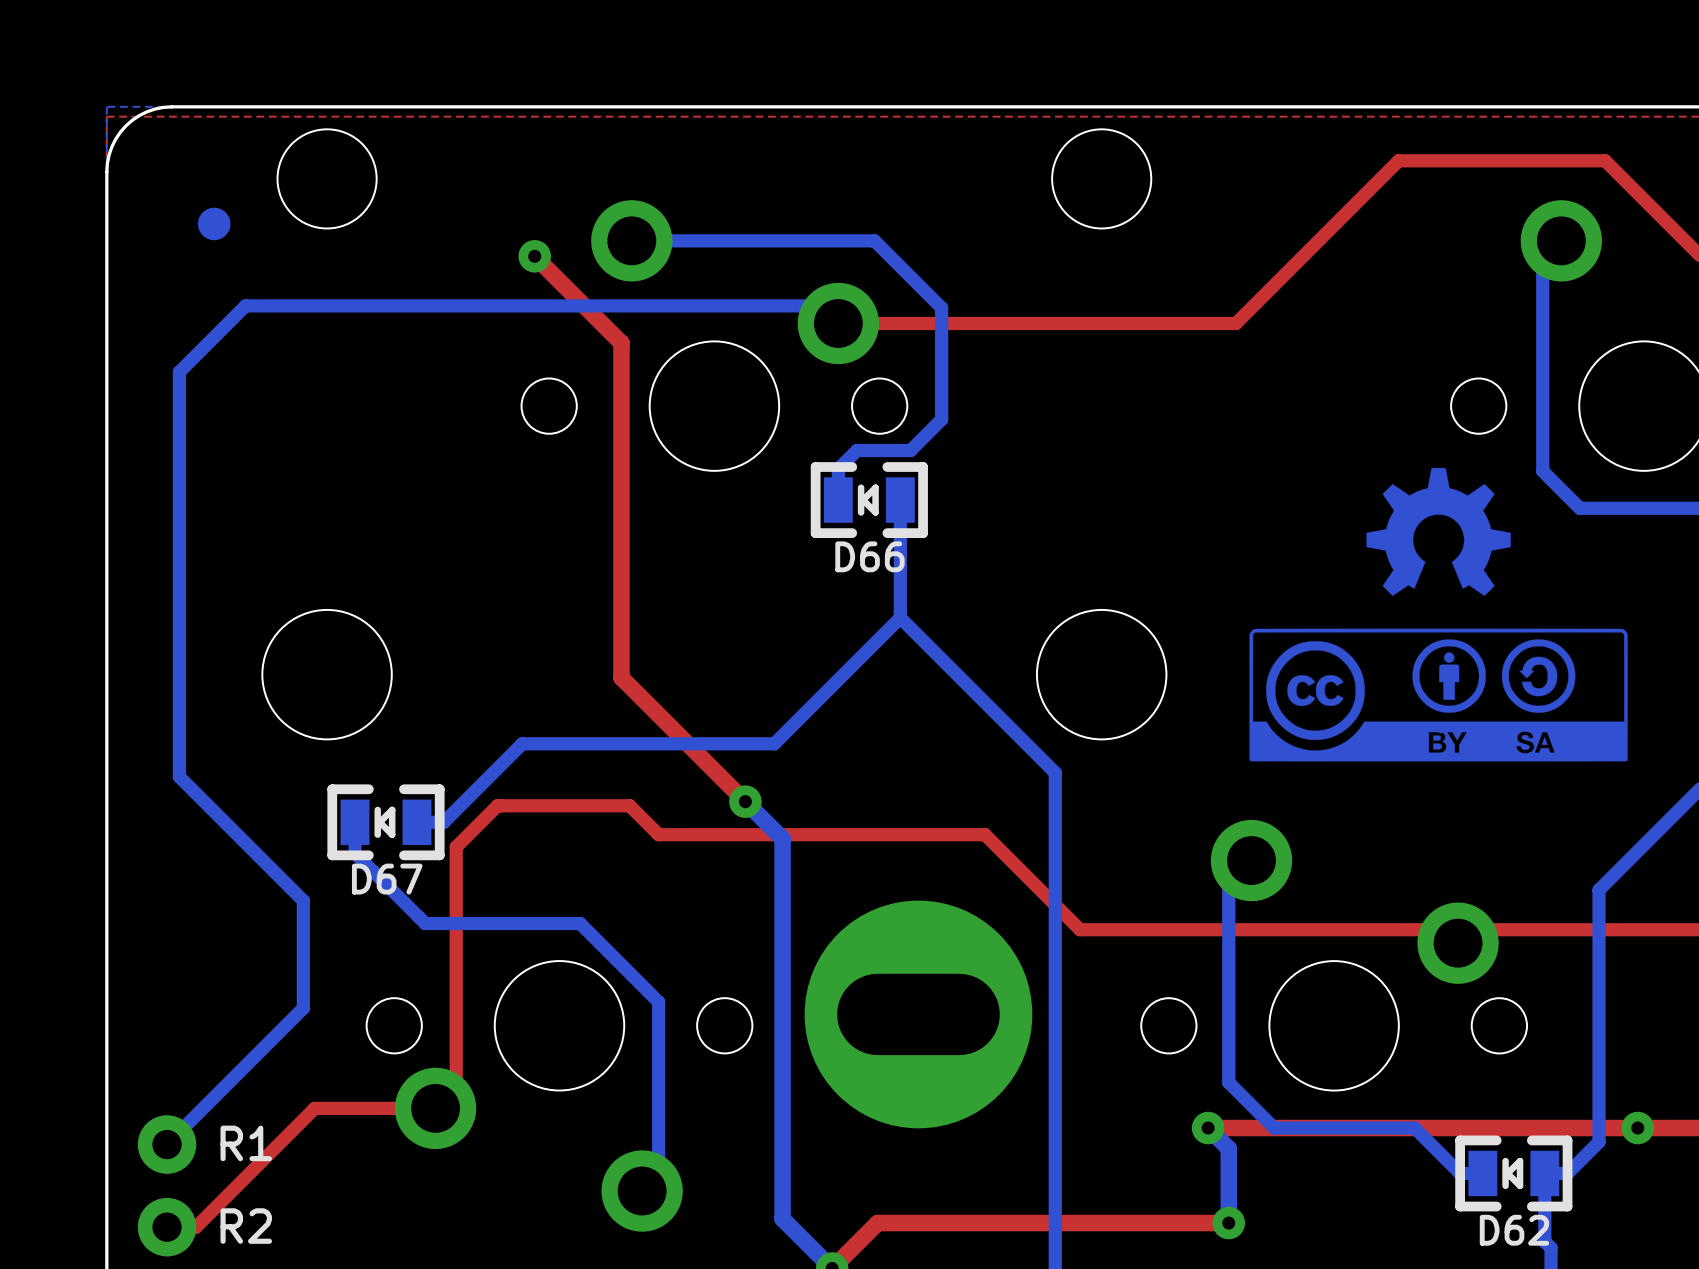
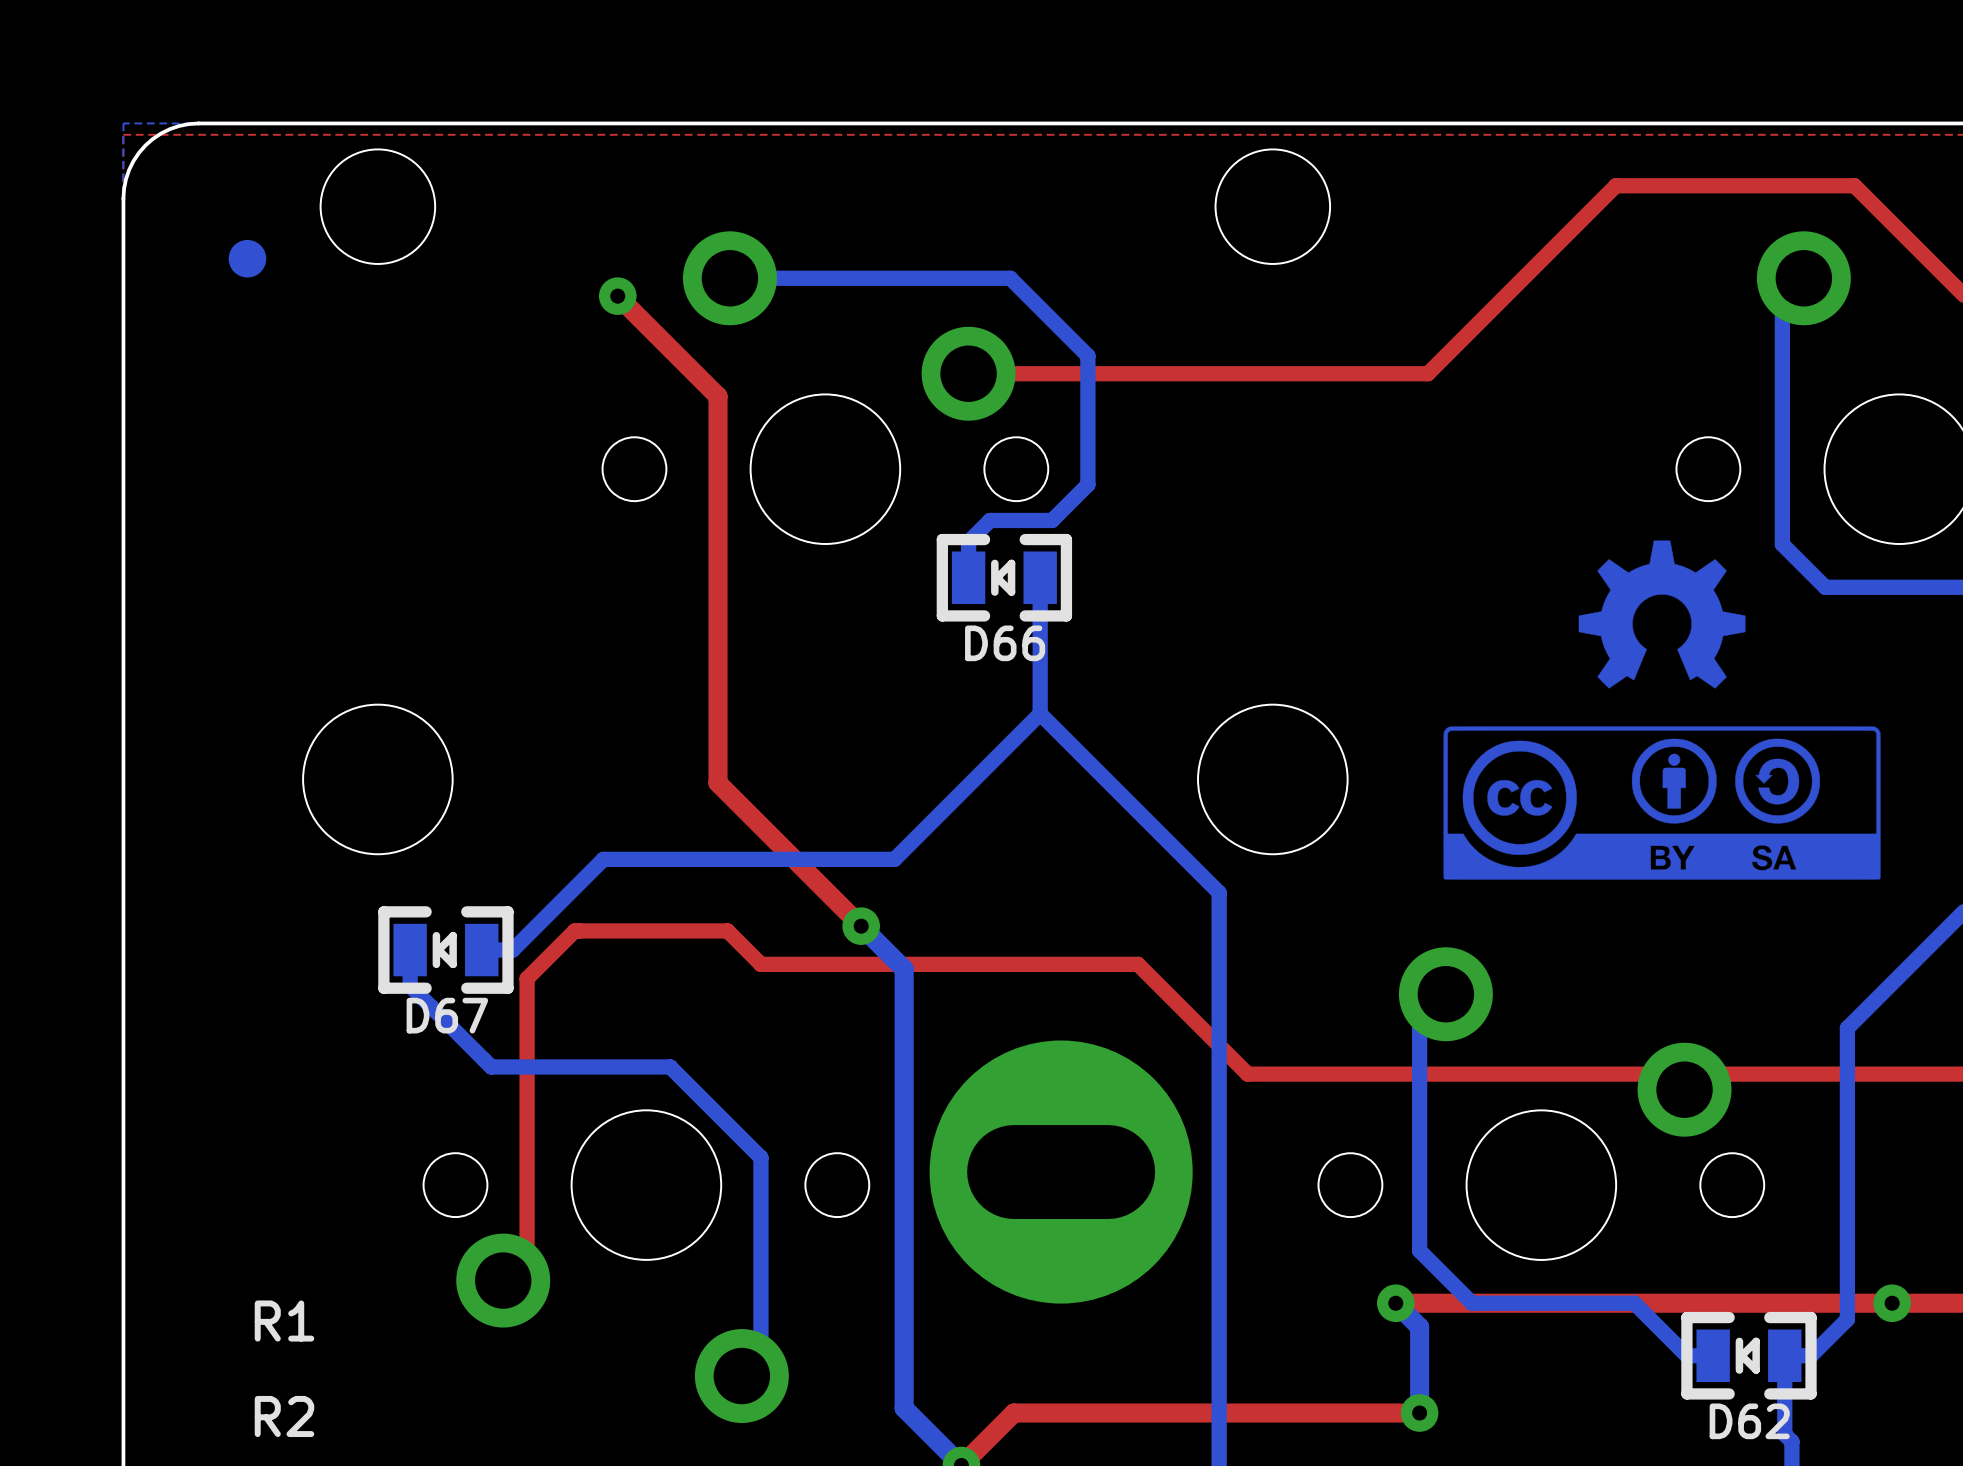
bottom track: (820, 305) (245, 305) (179, 372) (179, 776) (303, 900) (303, 1008) (167, 1144) -> none
top track: (435, 1108) (314, 1108) (195, 1227) (167, 1227) -> none
part: (167, 1144) -> none
part: (167, 1227) -> none

